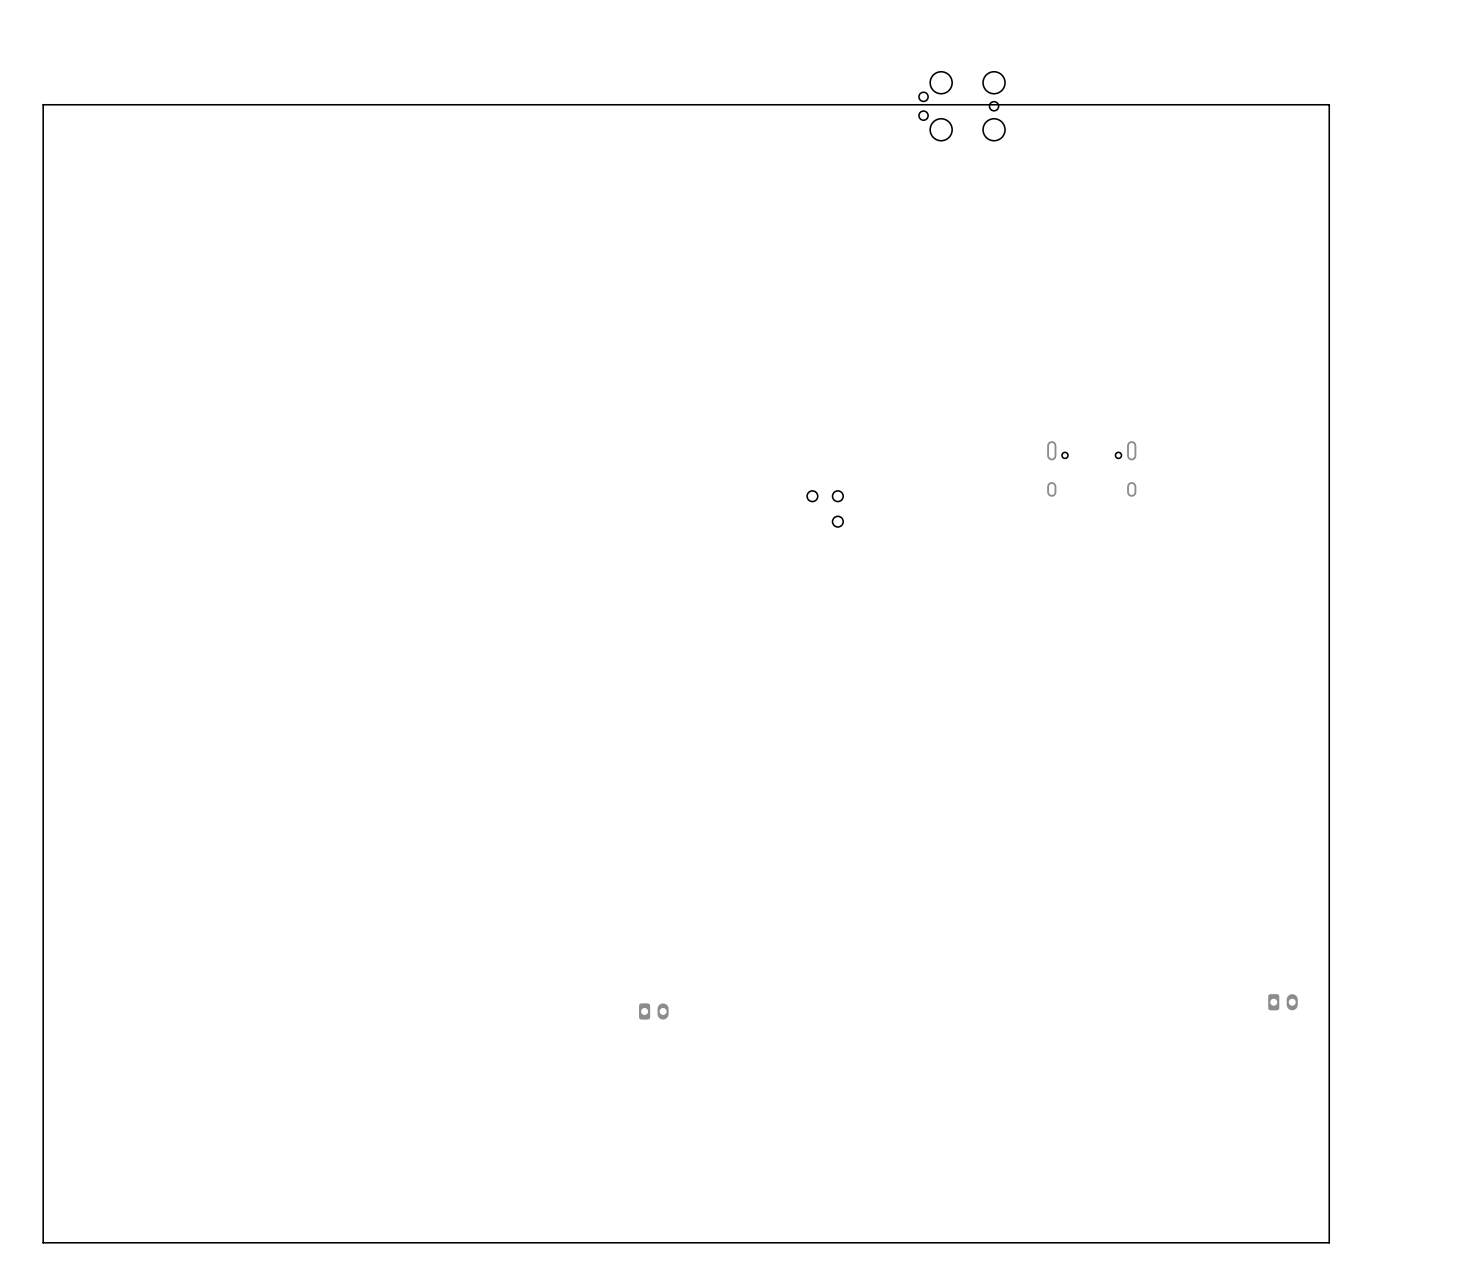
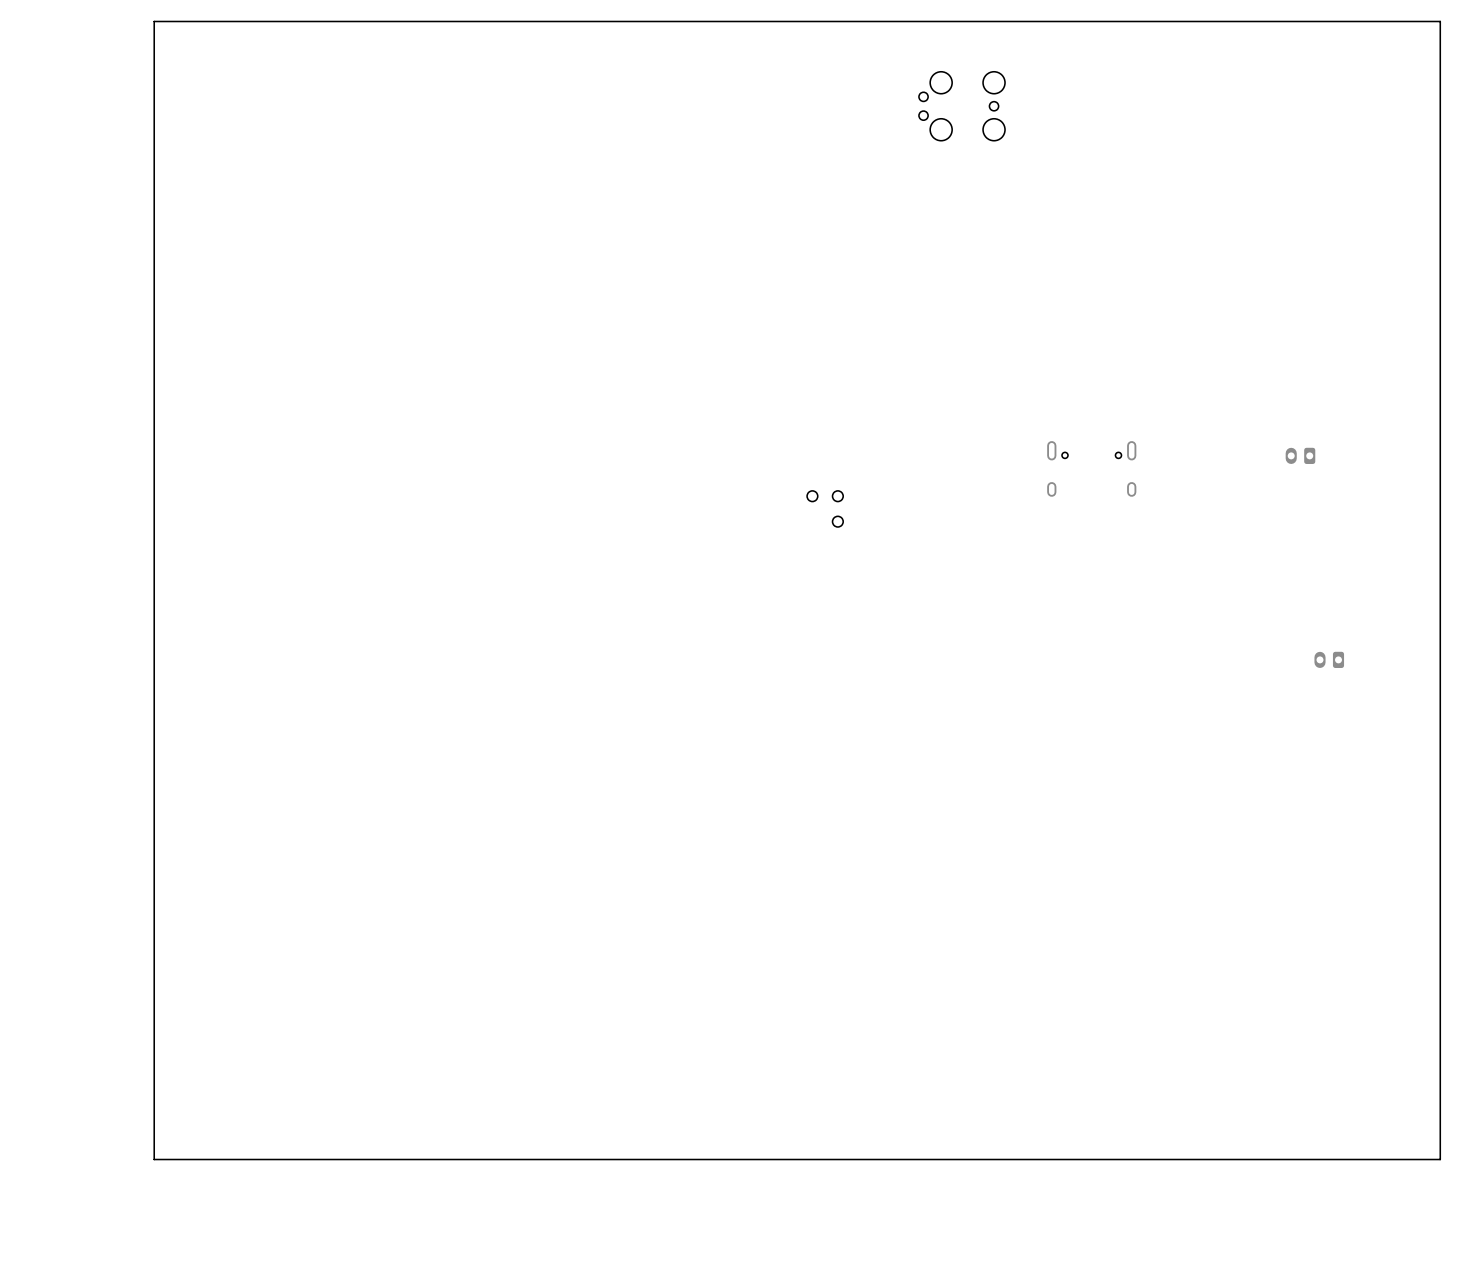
board edge: (1329, 104) (43, 104) (43, 1242) (1329, 1242) (1329, 104) -> (1440, 21) (154, 21) (154, 1159) (1440, 1159) (1440, 21)
part: none -> (1300, 455)
part: none -> (1329, 659)
part: (1282, 1002) -> none
part: (653, 1011) -> none

